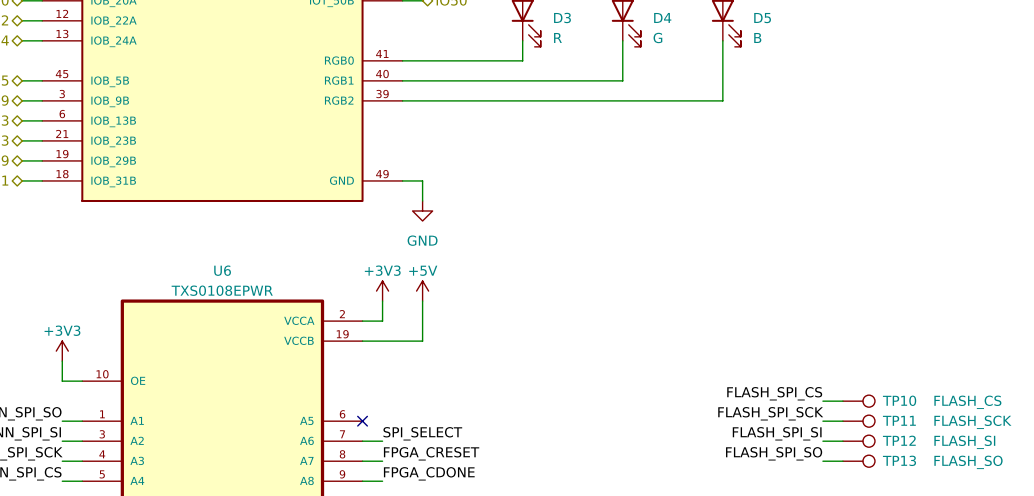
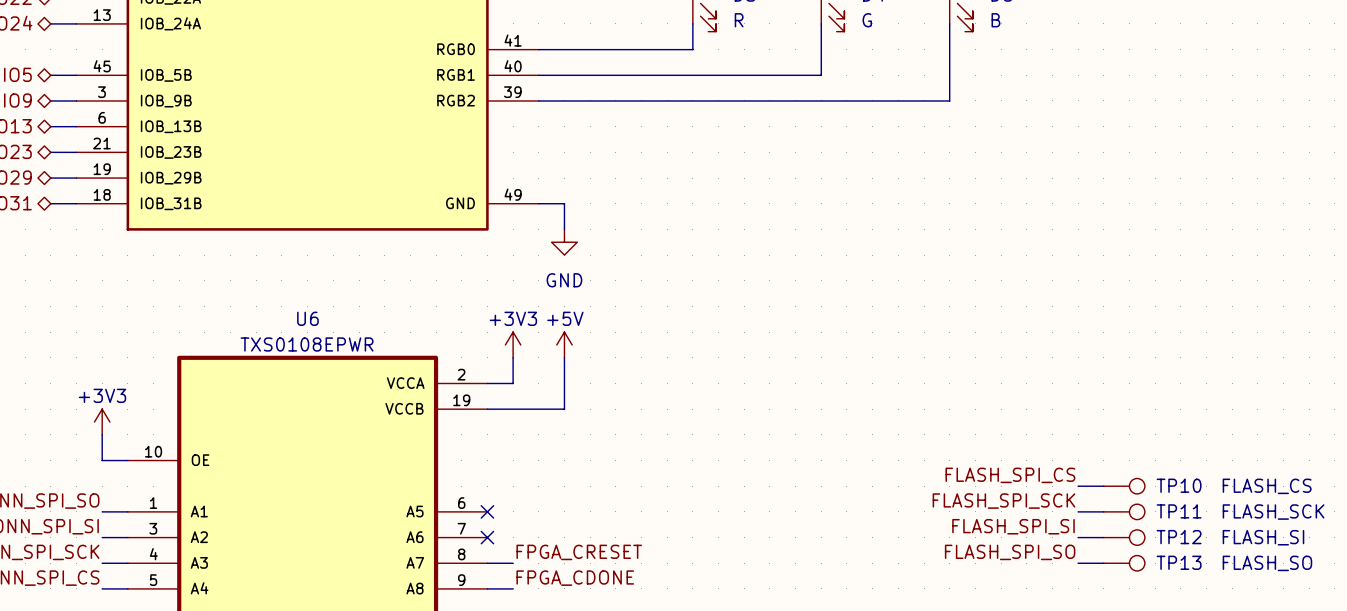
label: SPI_SELECT (422, 433) -> none
wire: (362, 441) (382, 441) -> none
no-connect mark: none -> (487, 537)

